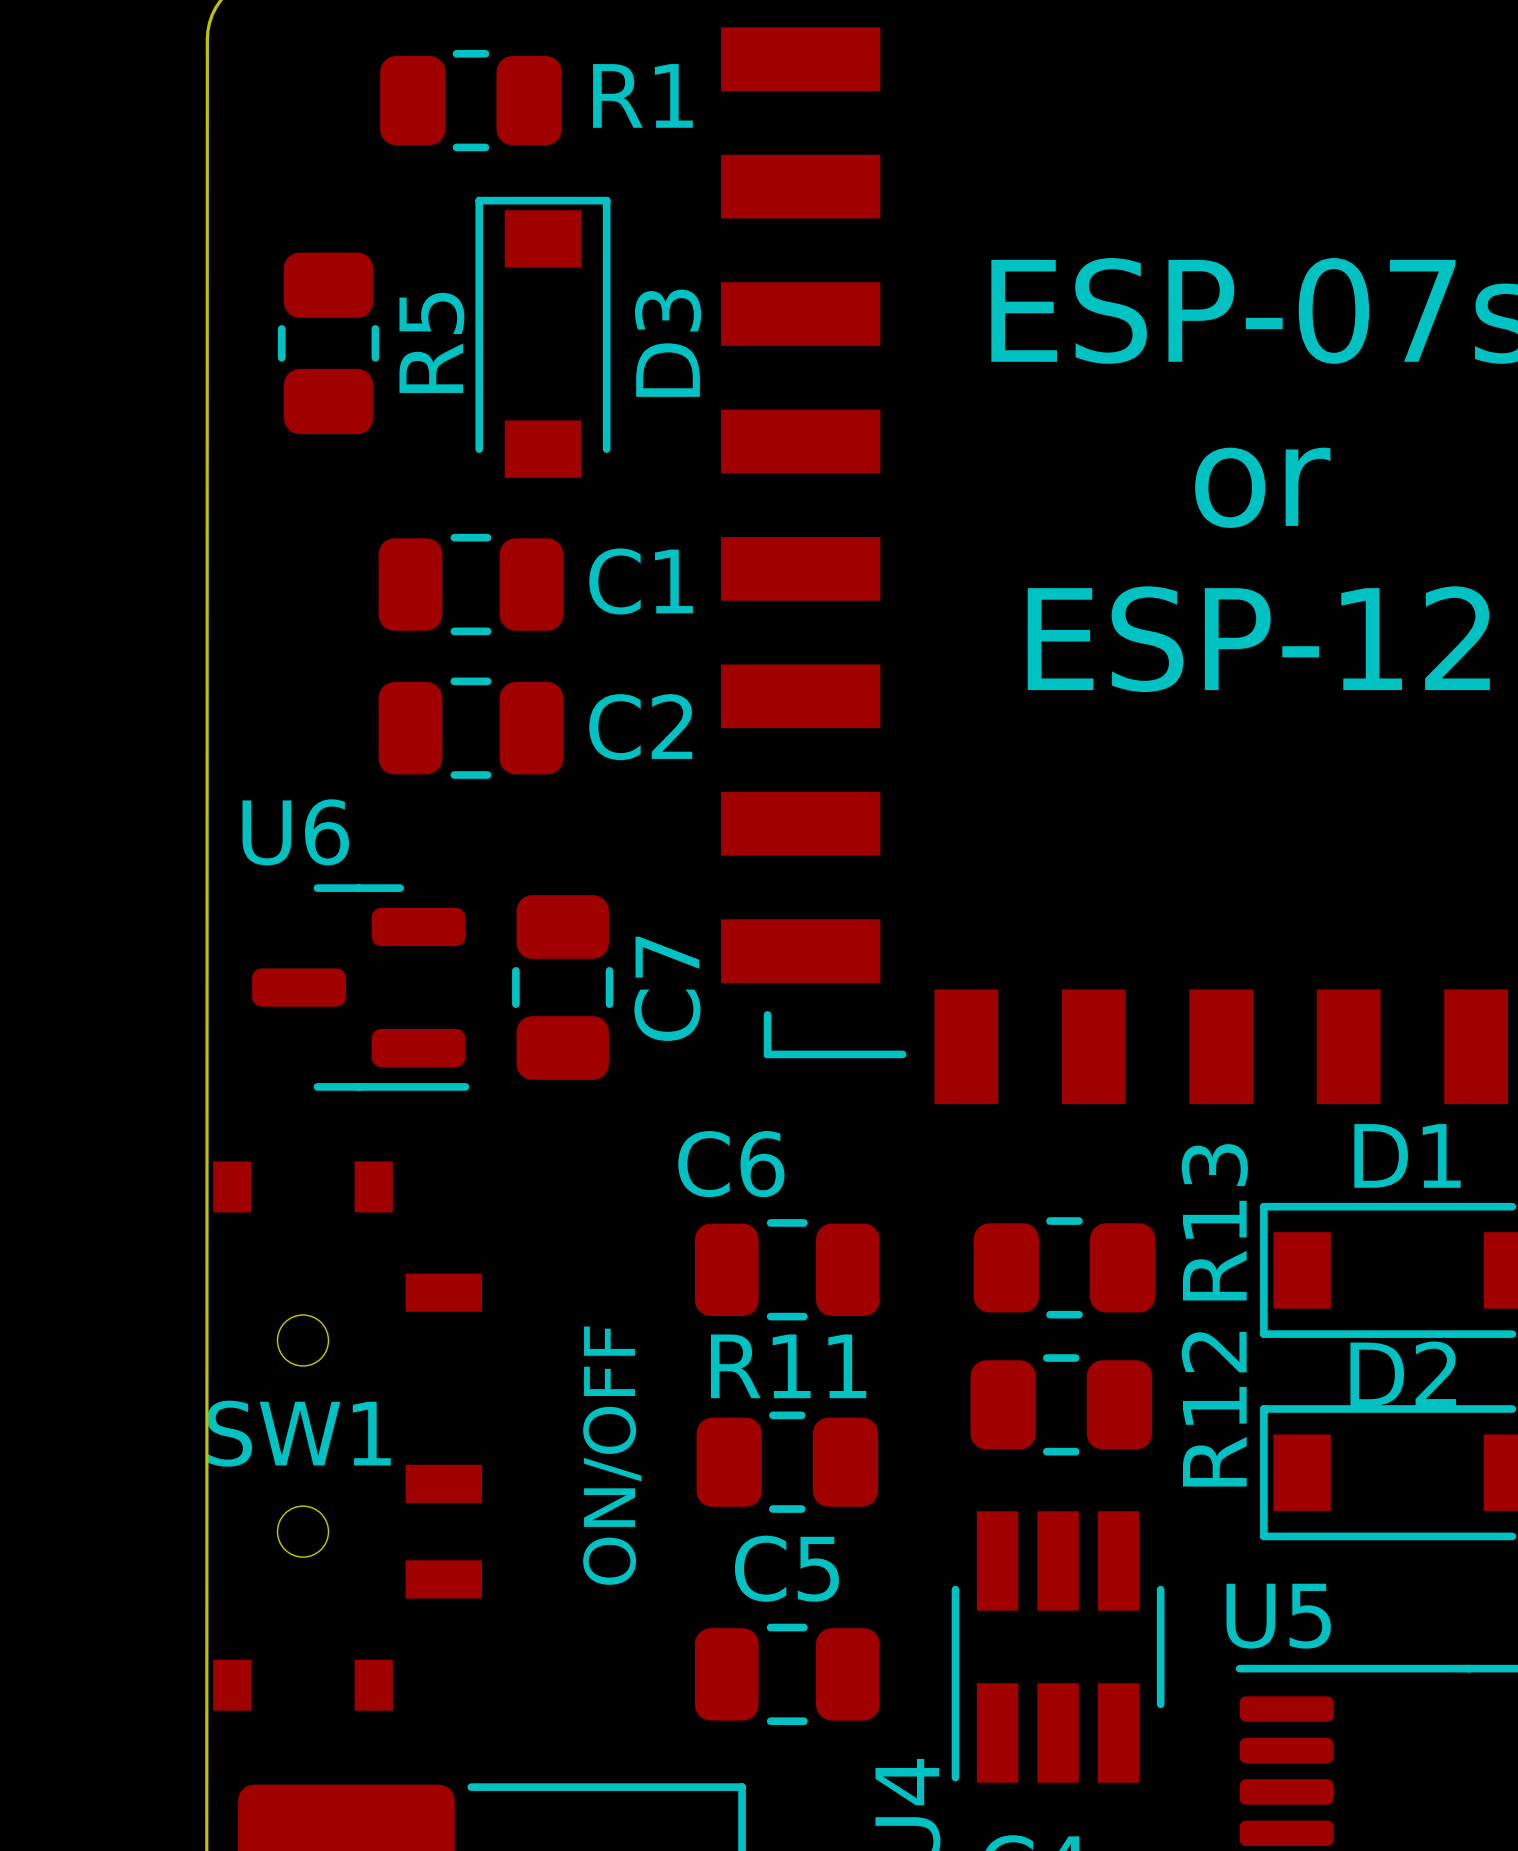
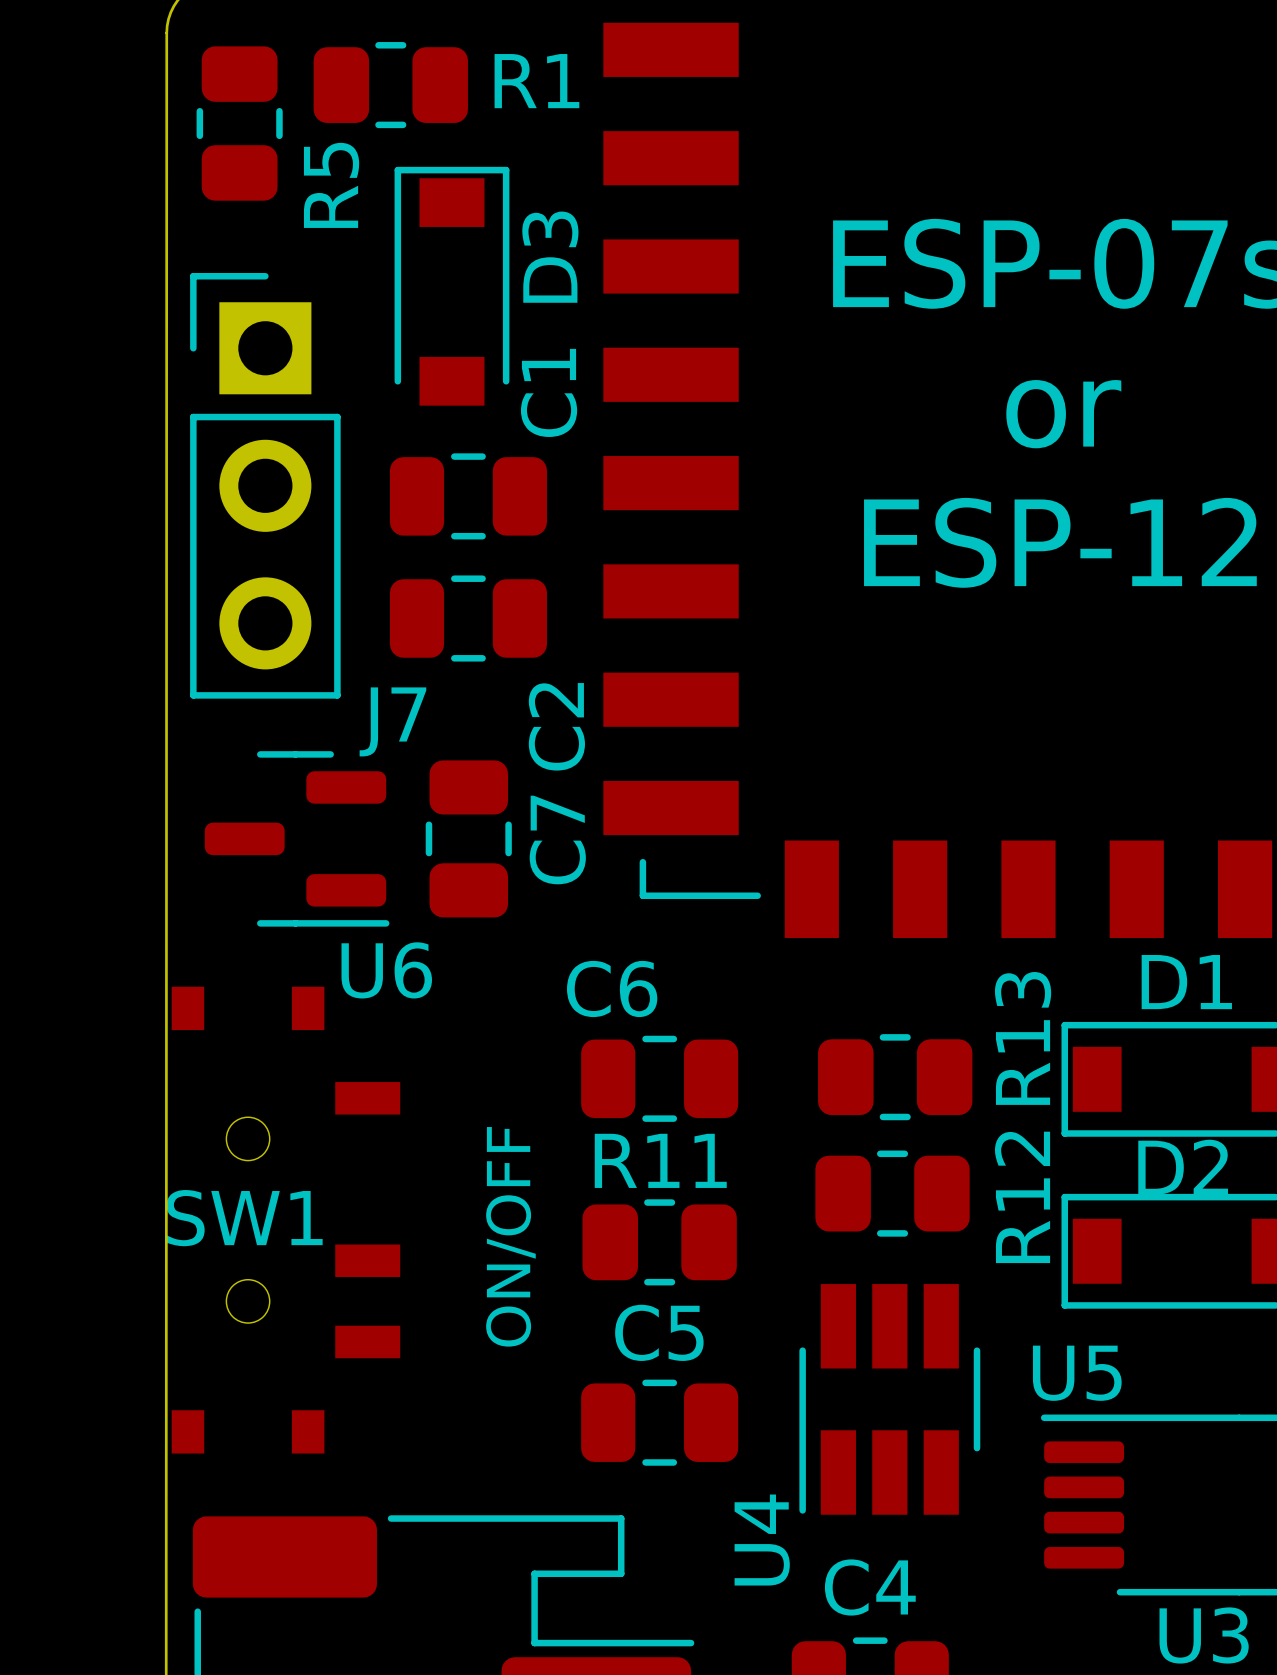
R5 name position: R5 (431, 342) -> R5 (331, 185)
R5 position: (328, 343) -> (239, 123)
D3 name position: D3 (668, 343) -> D3 (550, 257)
J7: none -> (265, 485)
C1 name rotation: 0° (641, 581) -> 90° counterclockwise (549, 392)
C1 position: (470, 584) -> (468, 496)
C2 name rotation: 0° (640, 727) -> 90° counterclockwise (556, 726)
C2 position: (470, 728) -> (468, 618)
U6 name position: U6 (295, 832) -> U6 (386, 970)

